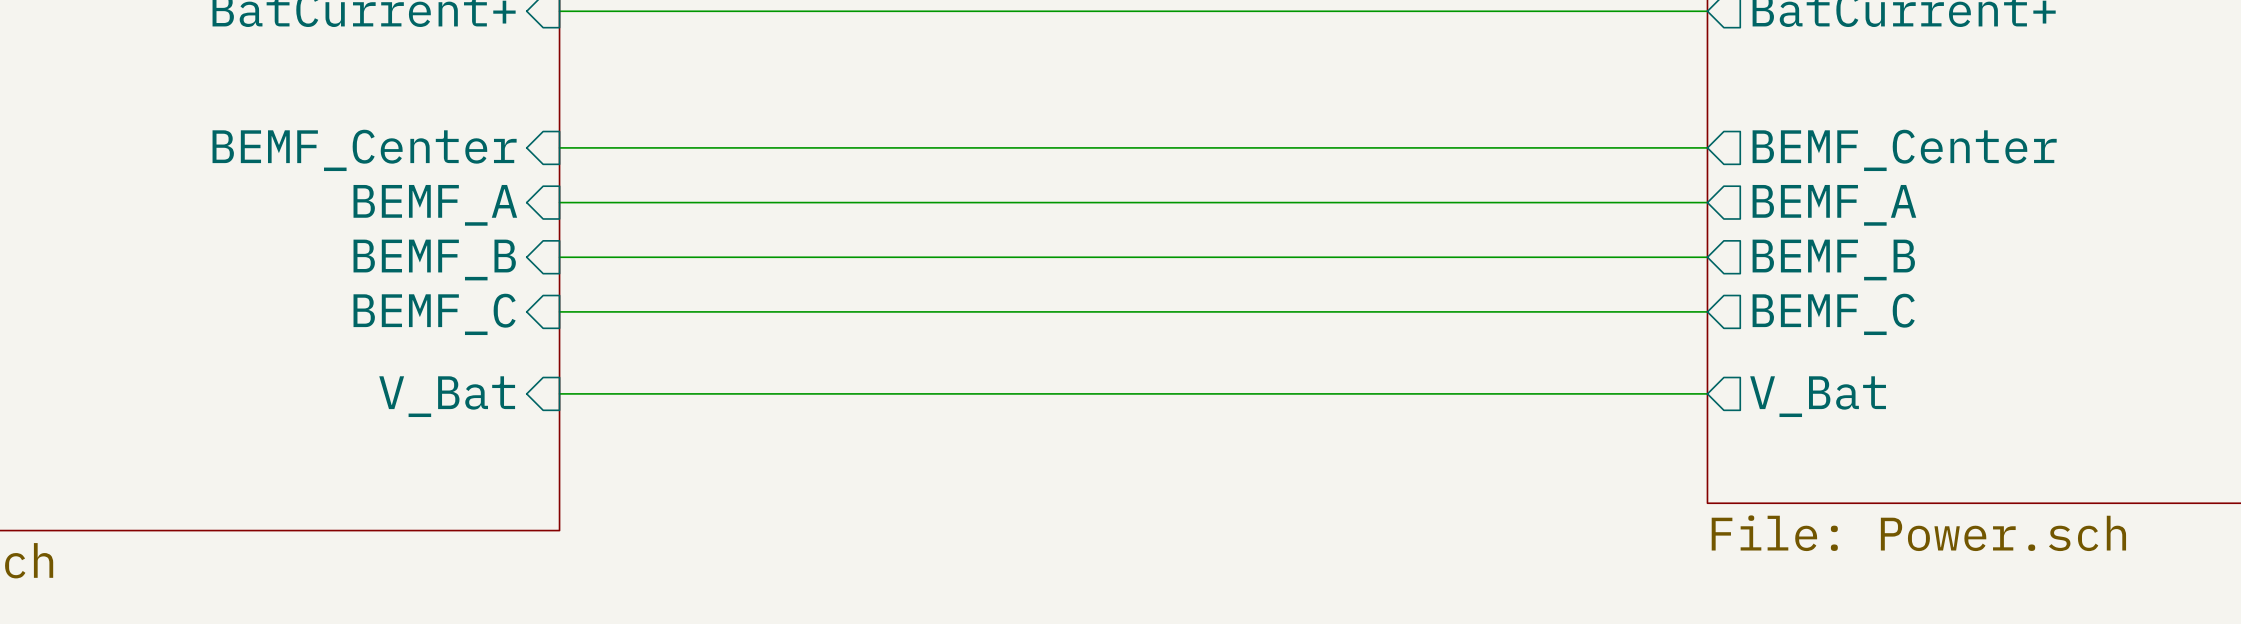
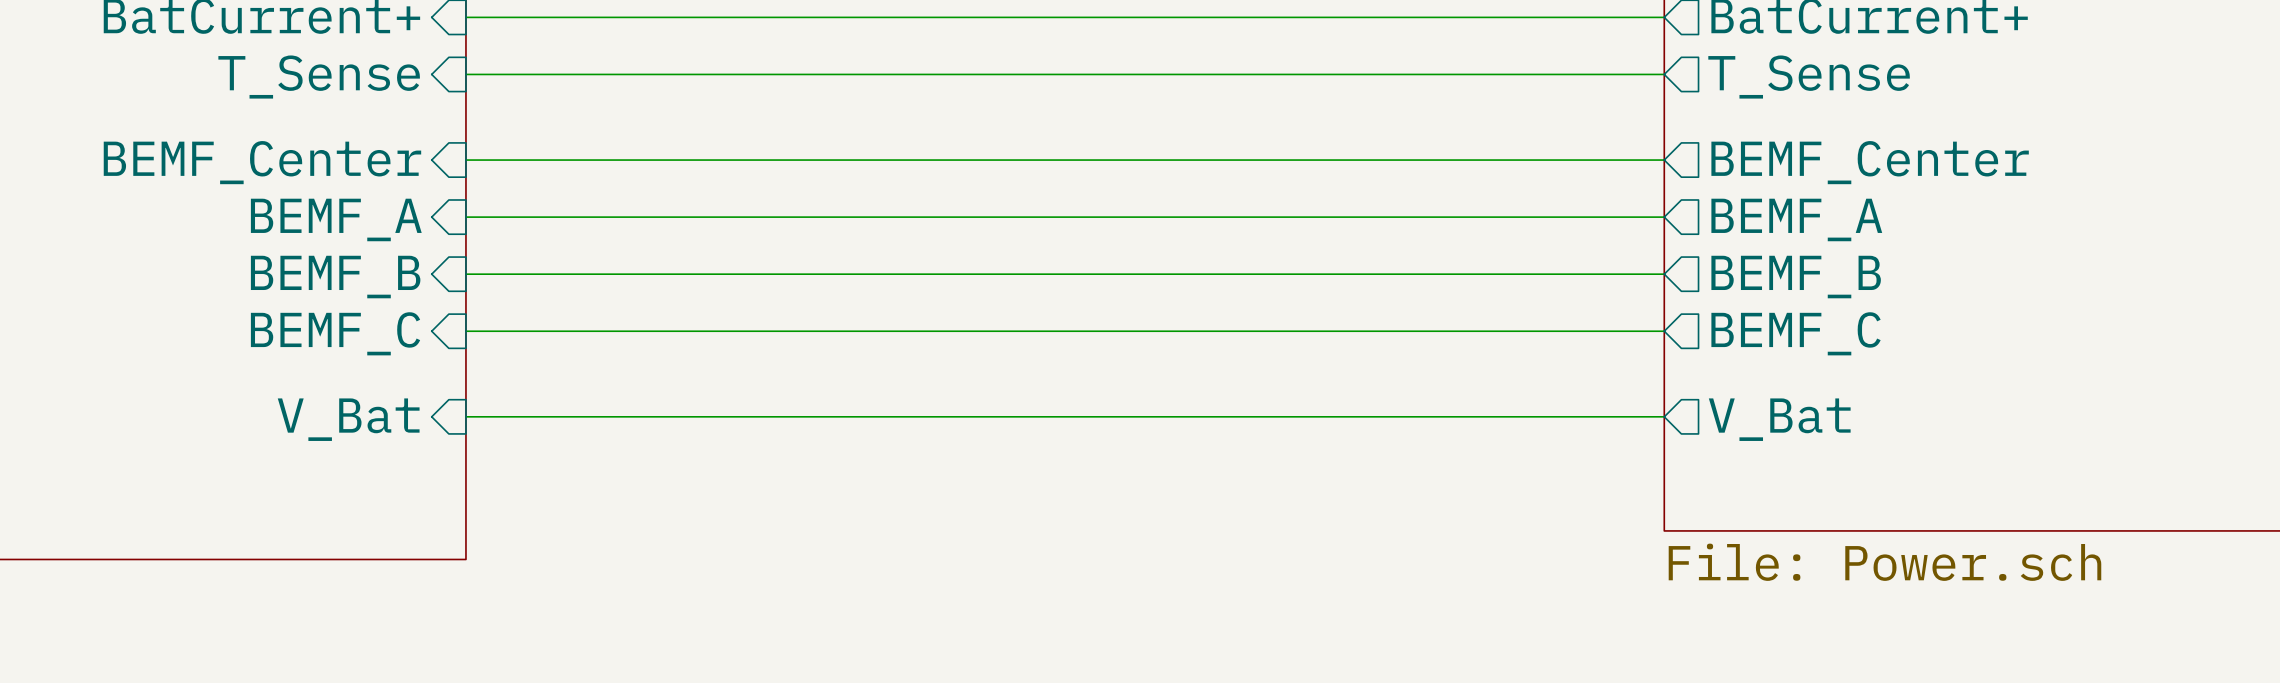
wire: none -> (465, 74) (1664, 74)
sheet pin: none -> T_Sense (319, 77)
sheet pin: none -> T_Sense (1809, 77)

